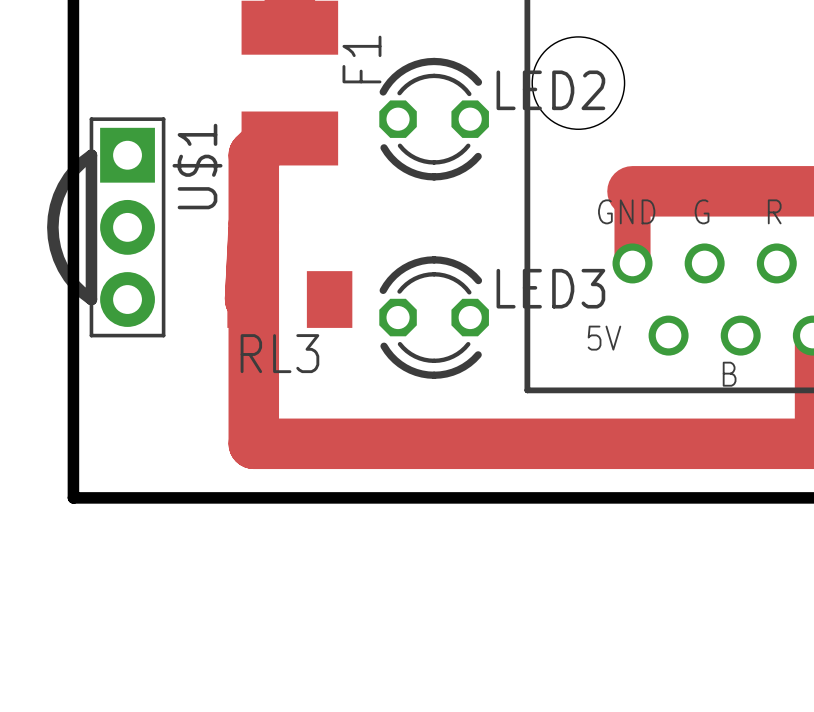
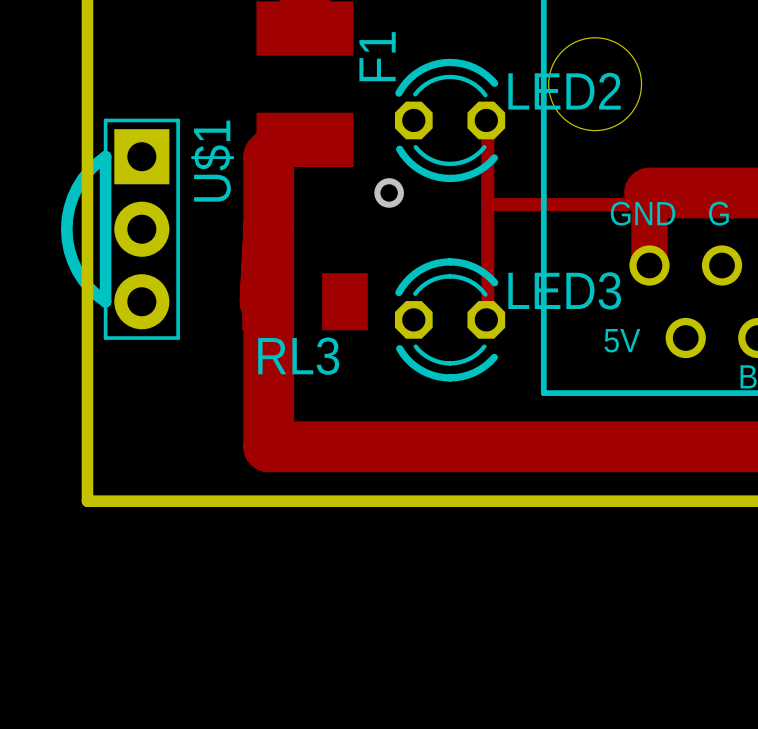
track: none -> (486, 120) (486, 319) (487, 314)
via: none -> (389, 192)
track: none -> (649, 192) (627, 204) (487, 204)

